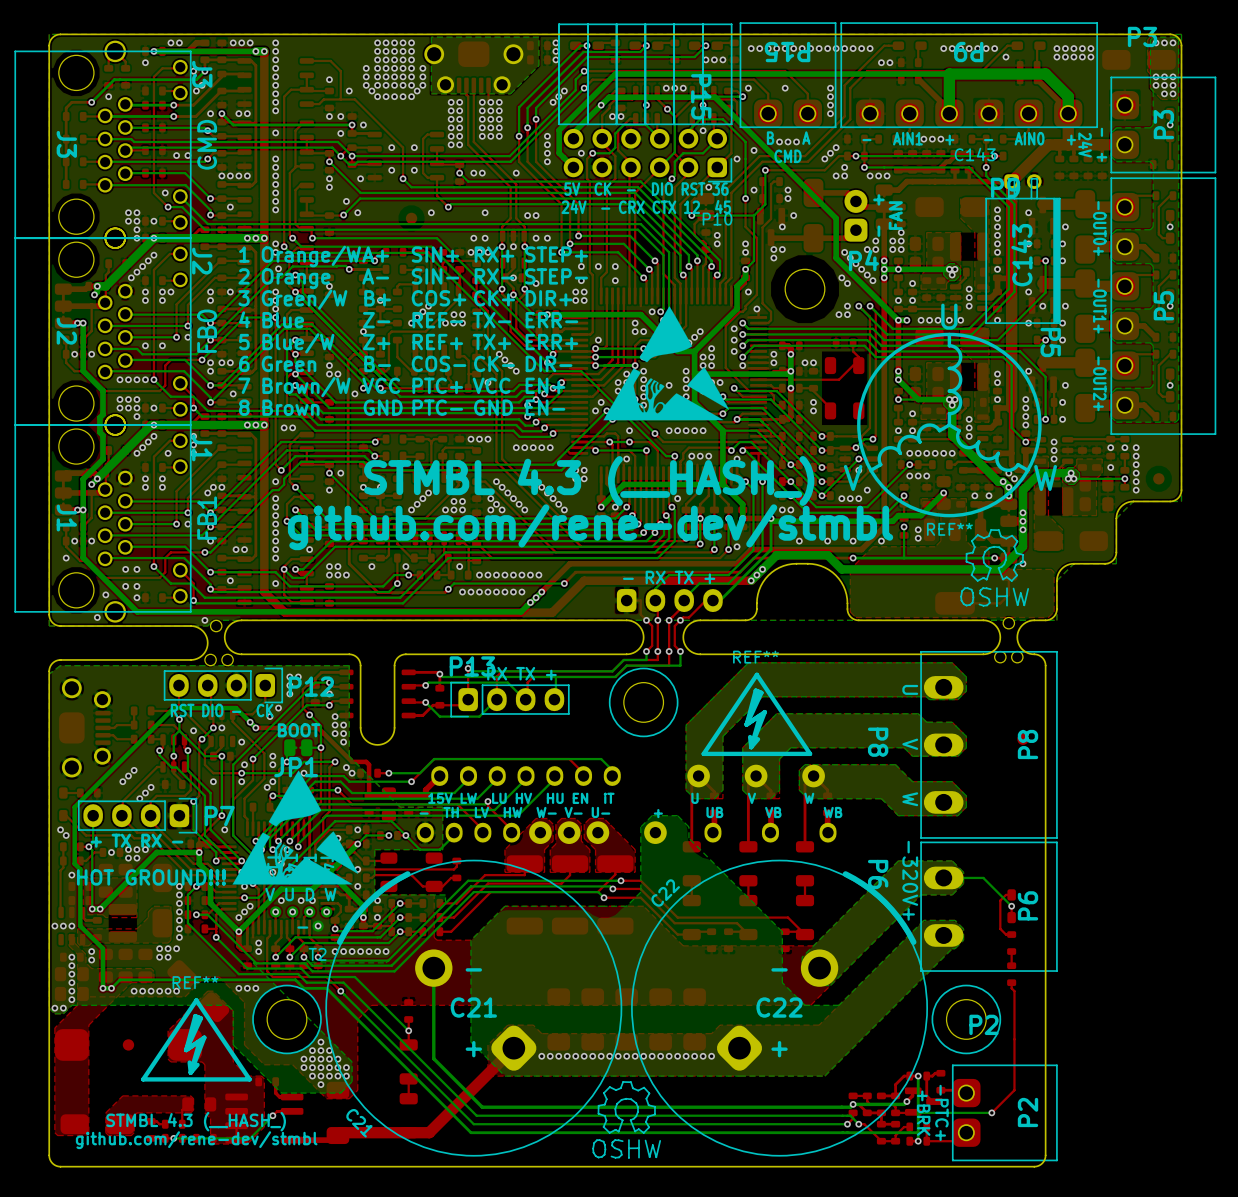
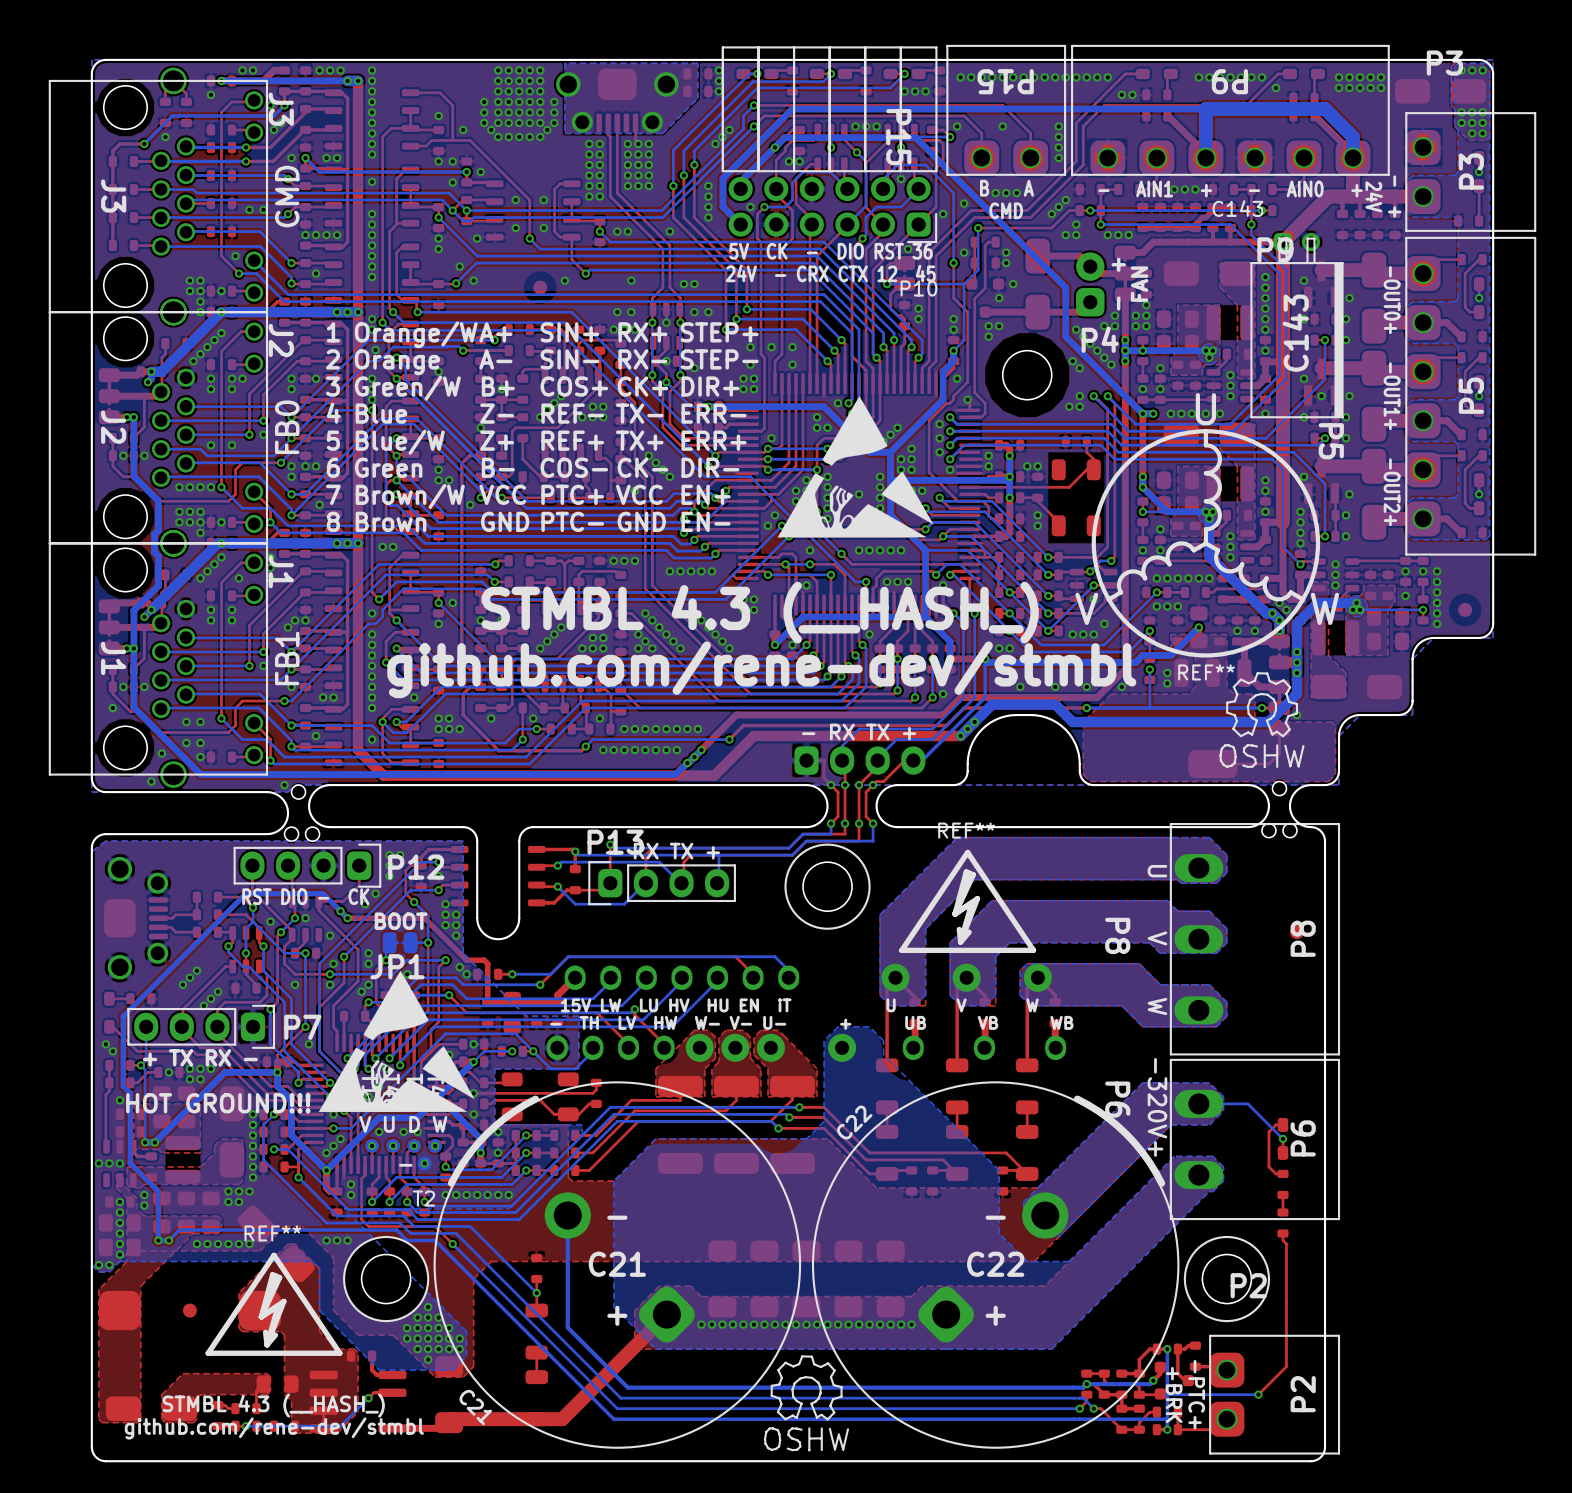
part footprint: [756, 207, 786, 246] -> [966, 278, 1005, 318]
part footprint: [904, 1087, 943, 1116] -> [1154, 1361, 1194, 1400]

